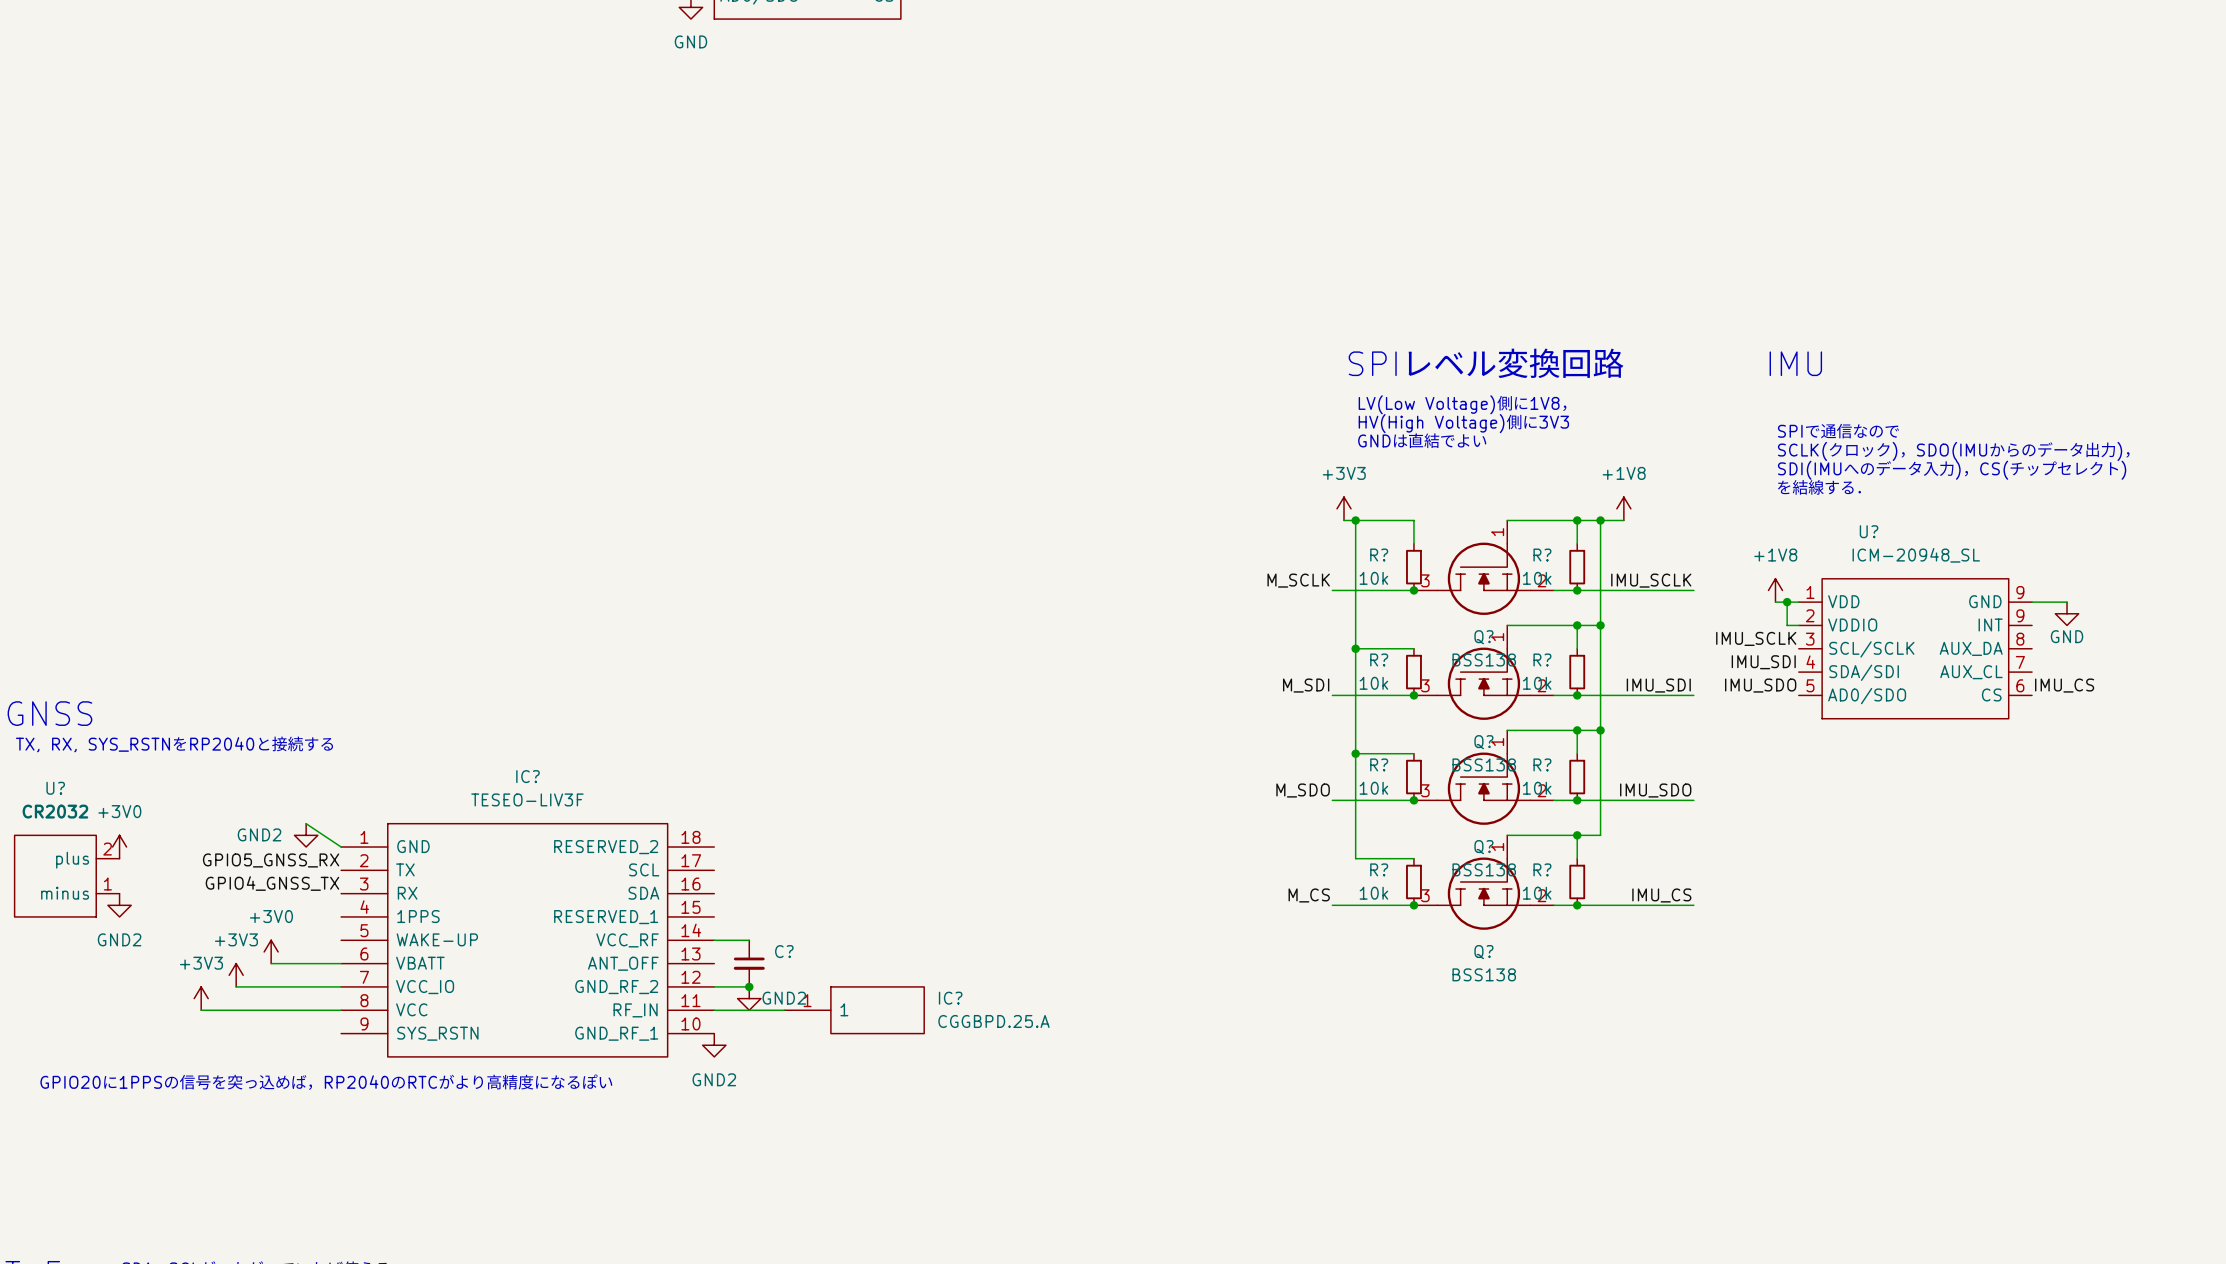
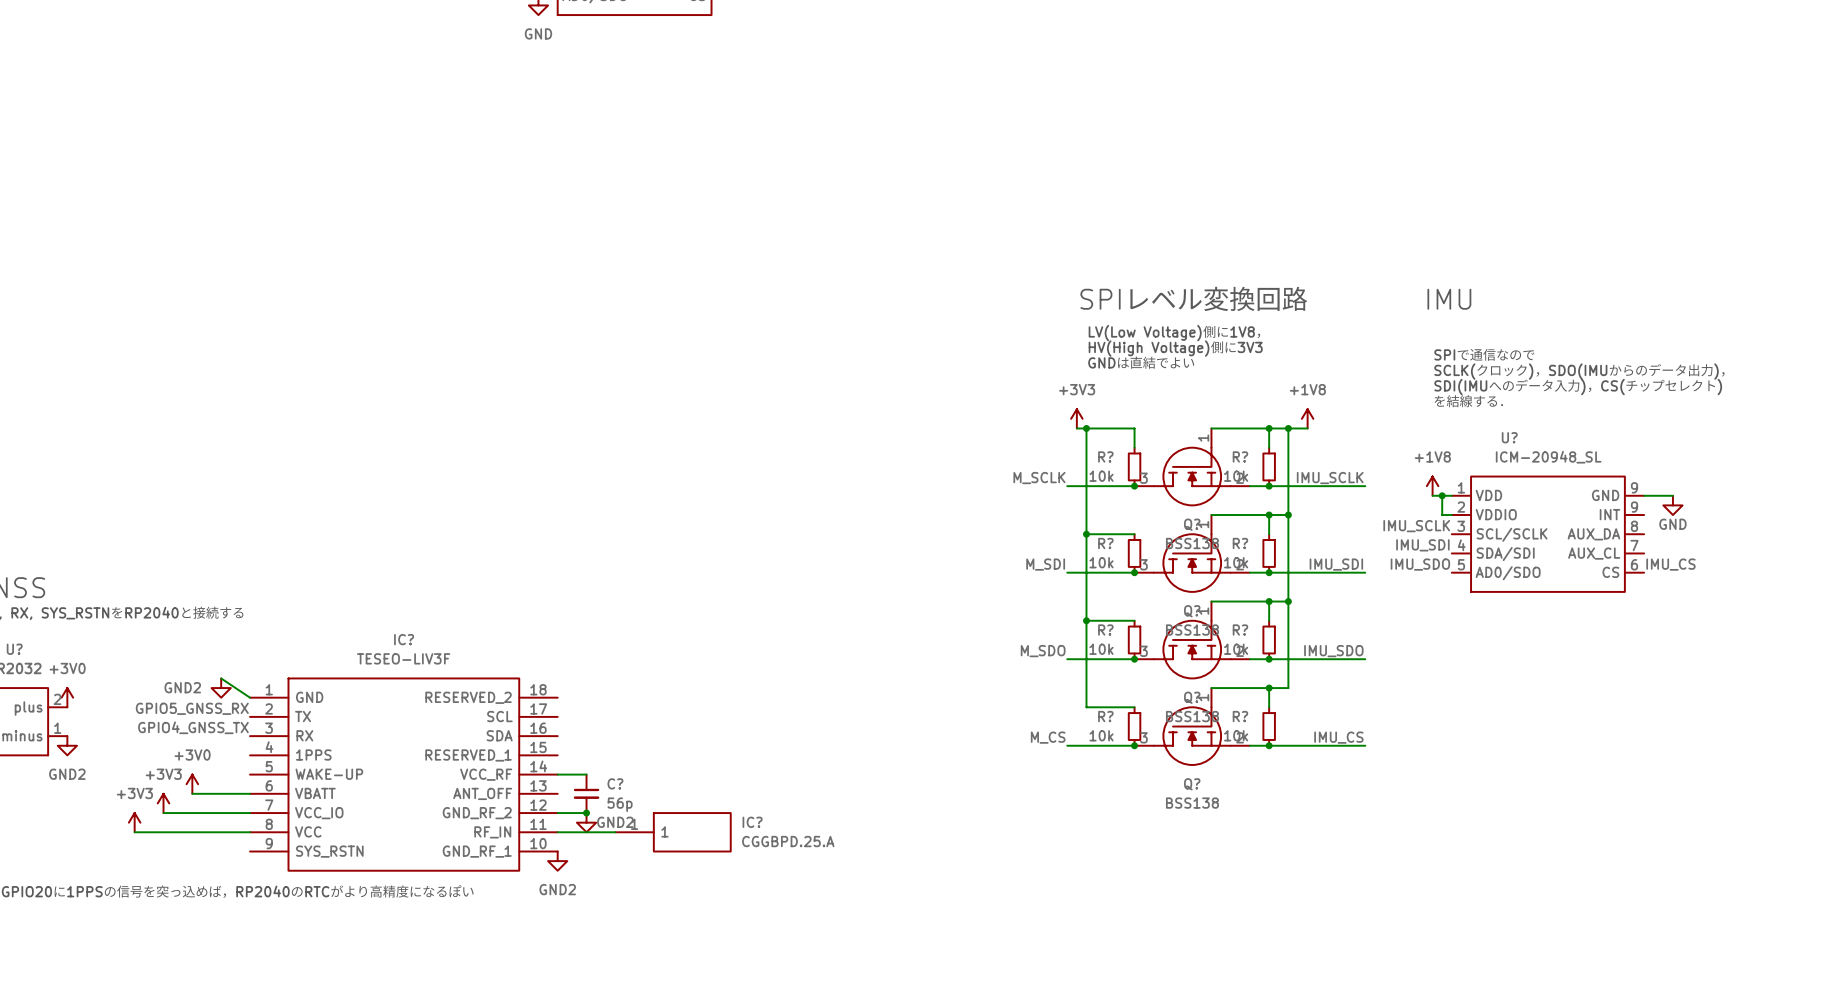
C? value: none -> 56p (620, 804)

